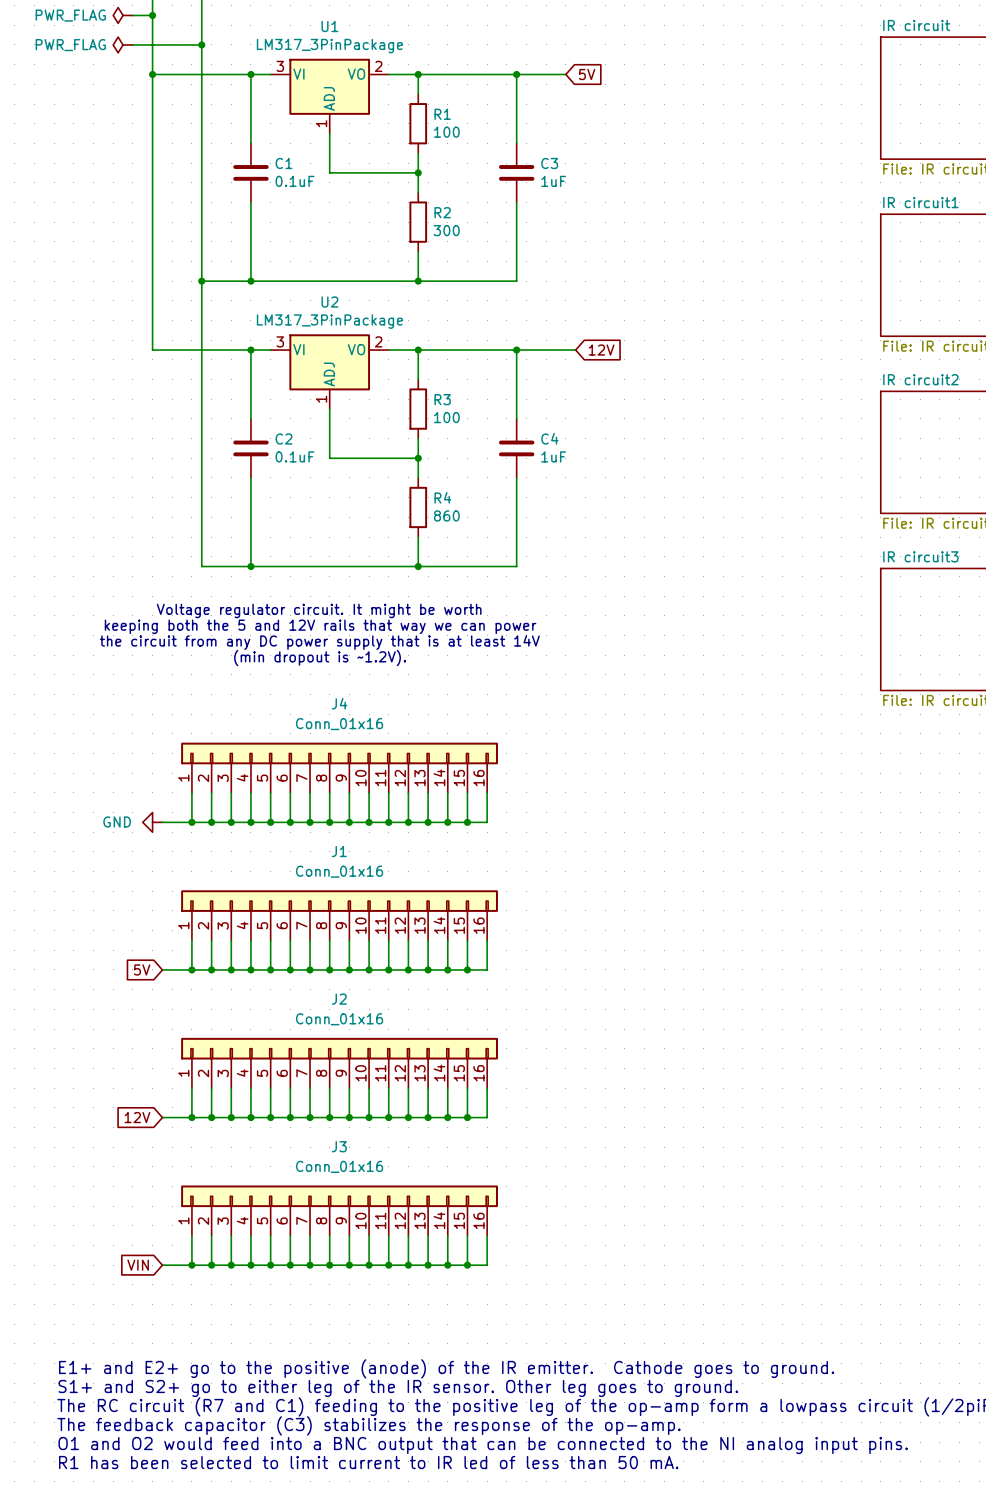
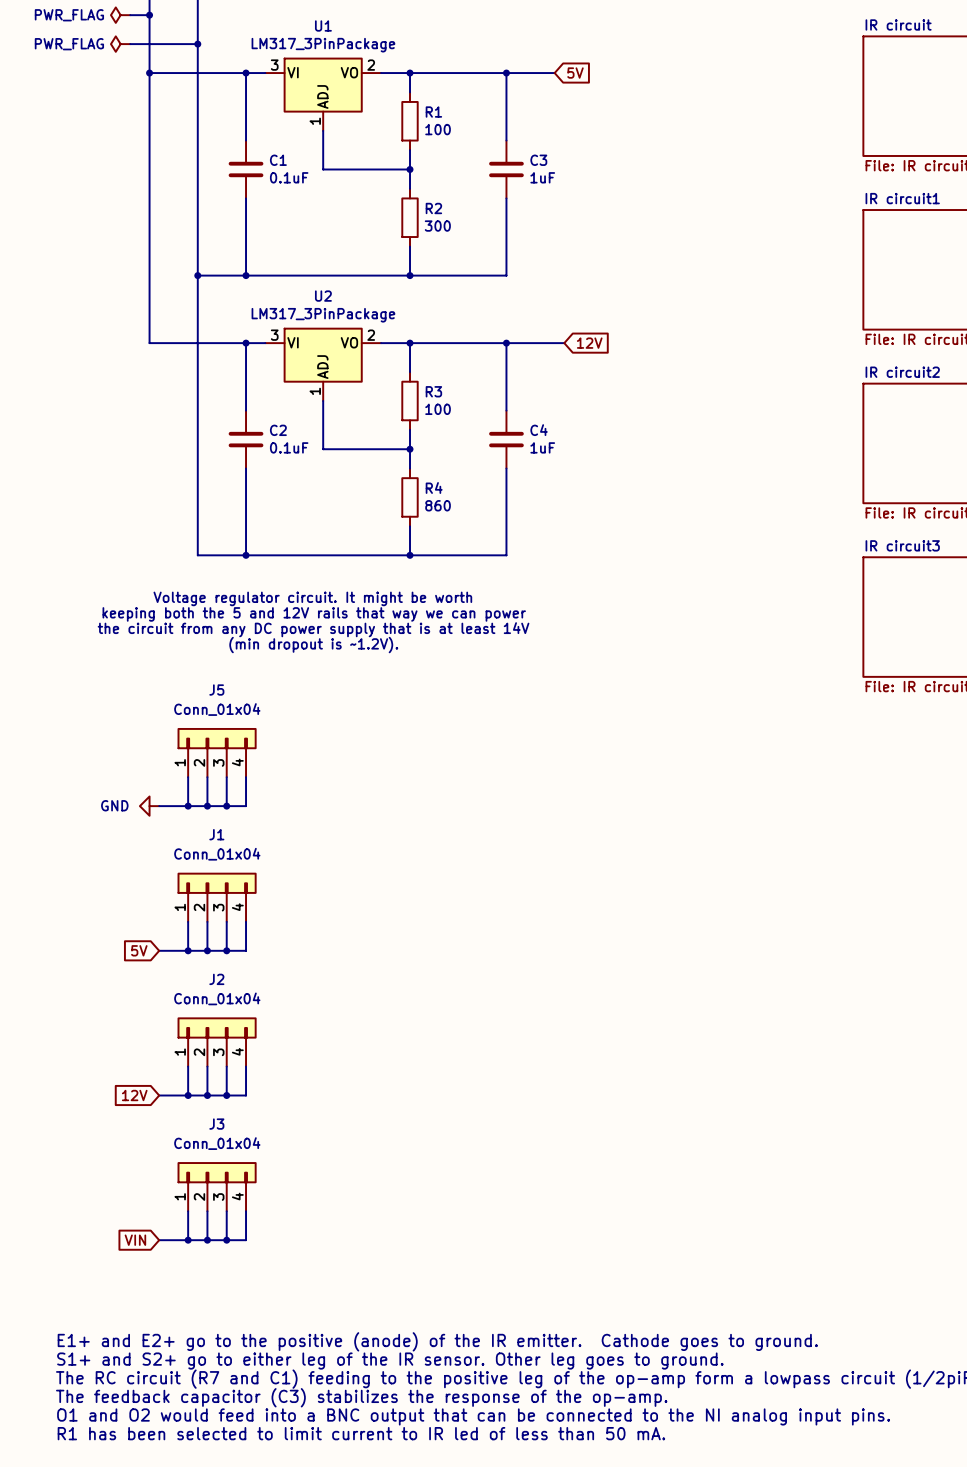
J5: none -> Conn_01x04 (217, 752)
J4: Conn_01x16 (339, 767) -> none
wire: (270, 792) (270, 822) -> none
wire: (290, 792) (290, 822) -> none
wire: (310, 792) (310, 822) -> none
wire: (329, 792) (329, 822) -> none
wire: (349, 792) (349, 822) -> none
wire: (369, 792) (369, 822) -> none
wire: (388, 792) (388, 822) -> none
wire: (408, 792) (408, 822) -> none
wire: (428, 792) (428, 822) -> none
wire: (447, 792) (447, 822) -> none
wire: (467, 792) (467, 822) -> none
wire: (487, 792) (487, 822) (250, 822) -> none
junction: (250, 822) -> none
junction: (270, 822) -> none
junction: (290, 822) -> none
junction: (310, 822) -> none
junction: (329, 822) -> none
junction: (349, 822) -> none
junction: (369, 822) -> none
junction: (388, 822) -> none
junction: (408, 822) -> none
junction: (428, 822) -> none
junction: (447, 822) -> none
junction: (467, 822) -> none
J1 value: Conn_01x16 (339, 871) -> Conn_01x04 (217, 854)
J1 symbol: [181, 890, 498, 941] -> [177, 872, 257, 922]
wire: (270, 940) (270, 969) -> none
wire: (290, 940) (290, 969) -> none
wire: (310, 940) (310, 969) -> none
wire: (329, 940) (329, 969) -> none
wire: (349, 940) (349, 969) -> none
wire: (369, 940) (369, 969) -> none
wire: (388, 940) (388, 969) -> none
wire: (408, 940) (408, 969) -> none
wire: (428, 940) (428, 969) -> none
wire: (447, 940) (447, 969) -> none
wire: (467, 940) (467, 969) -> none
wire: (487, 940) (487, 969) (250, 969) -> none
junction: (250, 969) -> none
junction: (270, 969) -> none
junction: (290, 969) -> none
junction: (310, 969) -> none
junction: (329, 969) -> none
junction: (349, 969) -> none
junction: (369, 969) -> none
junction: (388, 969) -> none
junction: (408, 969) -> none
junction: (428, 969) -> none
junction: (447, 969) -> none
junction: (467, 969) -> none
J2 value: Conn_01x16 (339, 1019) -> Conn_01x04 (217, 998)
J2 symbol: [181, 1037, 498, 1089] -> [177, 1017, 257, 1067]
wire: (270, 1088) (270, 1117) -> none
wire: (290, 1088) (290, 1117) -> none
wire: (310, 1088) (310, 1117) -> none
wire: (329, 1088) (329, 1117) -> none
wire: (349, 1088) (349, 1117) -> none
wire: (369, 1088) (369, 1117) -> none
wire: (388, 1088) (388, 1117) -> none
wire: (408, 1088) (408, 1117) -> none
wire: (428, 1088) (428, 1117) -> none
wire: (447, 1088) (447, 1117) -> none
wire: (467, 1088) (467, 1117) -> none
wire: (487, 1088) (487, 1117) (250, 1117) -> none
junction: (250, 1117) -> none
junction: (270, 1117) -> none
junction: (290, 1117) -> none
junction: (310, 1117) -> none
junction: (329, 1117) -> none
junction: (349, 1117) -> none
junction: (369, 1117) -> none
junction: (388, 1117) -> none
junction: (408, 1117) -> none
junction: (428, 1117) -> none
junction: (447, 1117) -> none
junction: (467, 1117) -> none
J3 value: Conn_01x16 (339, 1166) -> Conn_01x04 (217, 1143)
J3 symbol: [181, 1185, 498, 1236] -> [177, 1162, 257, 1212]
wire: (270, 1235) (270, 1265) -> none
wire: (290, 1235) (290, 1265) -> none
wire: (310, 1235) (310, 1265) -> none
wire: (329, 1235) (329, 1265) -> none
wire: (349, 1235) (349, 1265) -> none
wire: (369, 1235) (369, 1265) -> none
wire: (388, 1235) (388, 1265) -> none
wire: (408, 1235) (408, 1265) -> none
wire: (428, 1235) (428, 1265) -> none
wire: (447, 1235) (447, 1265) -> none
wire: (467, 1235) (467, 1265) -> none
wire: (487, 1235) (487, 1265) (250, 1265) -> none
junction: (250, 1265) -> none
junction: (270, 1265) -> none
junction: (290, 1265) -> none
junction: (310, 1265) -> none
junction: (329, 1265) -> none
junction: (349, 1265) -> none
junction: (369, 1265) -> none
junction: (388, 1265) -> none
junction: (408, 1265) -> none
junction: (428, 1265) -> none
junction: (447, 1265) -> none
junction: (467, 1265) -> none

